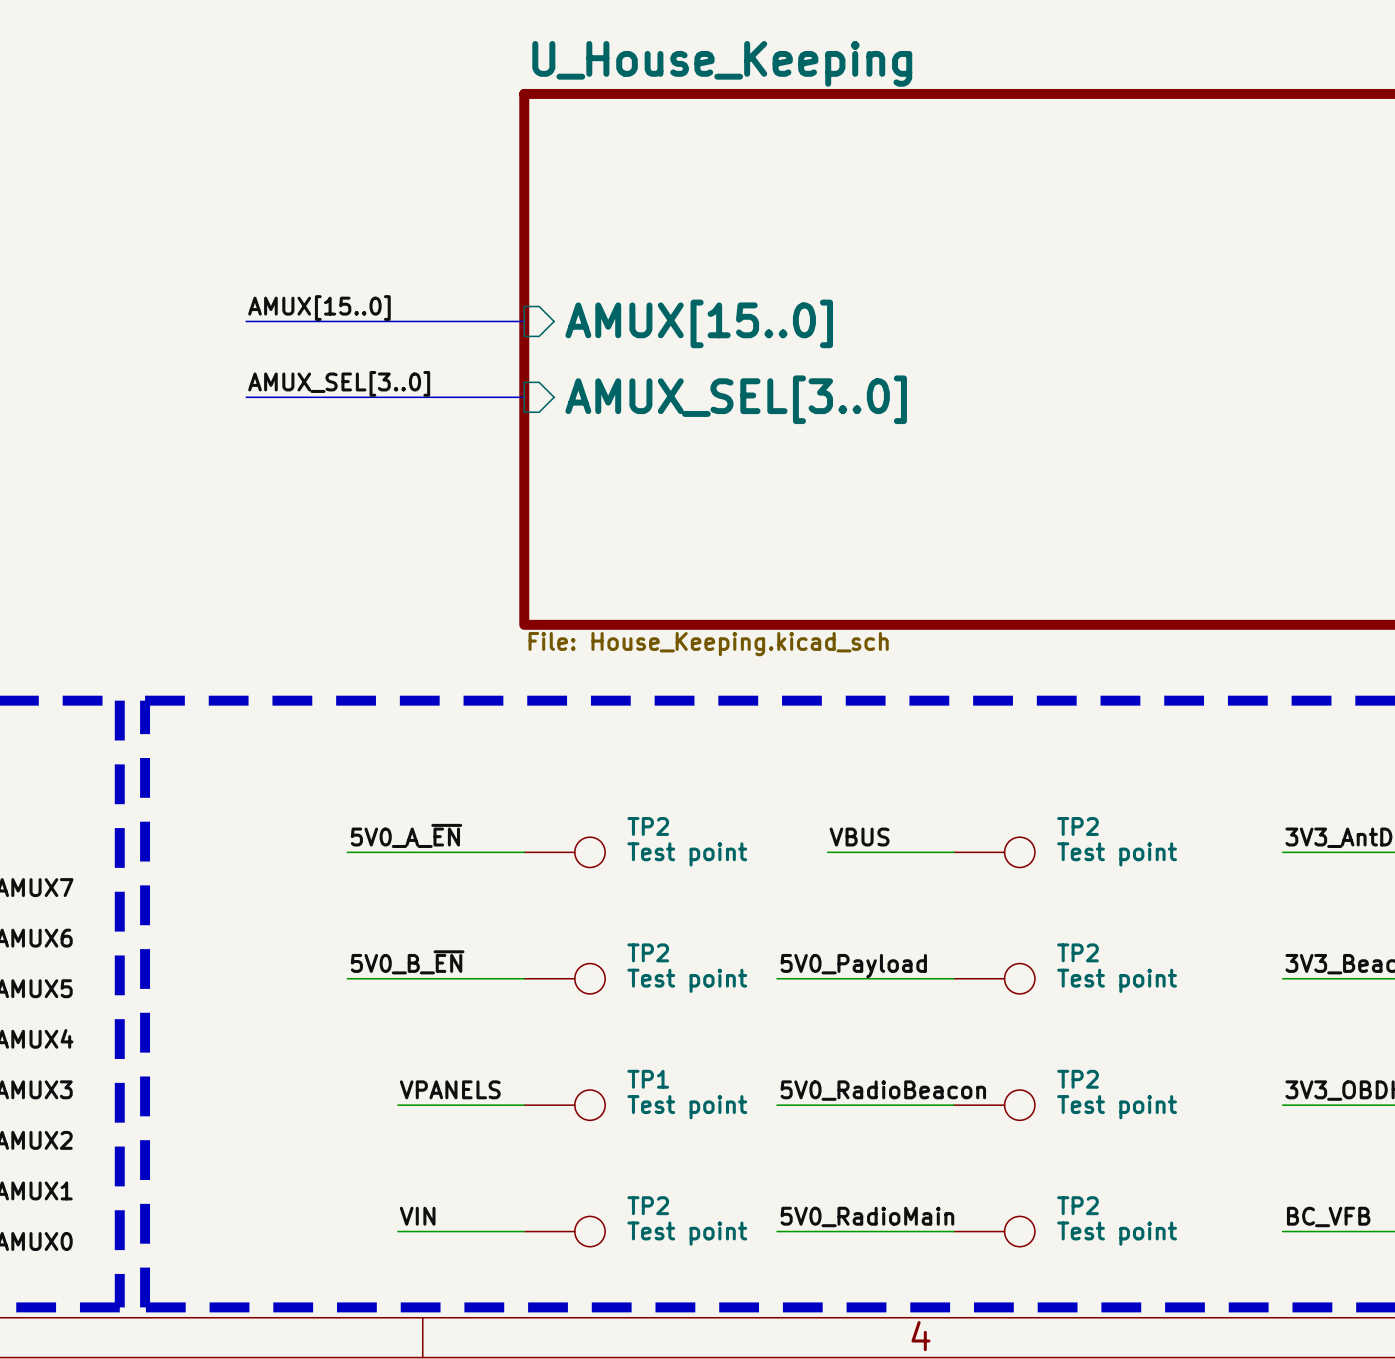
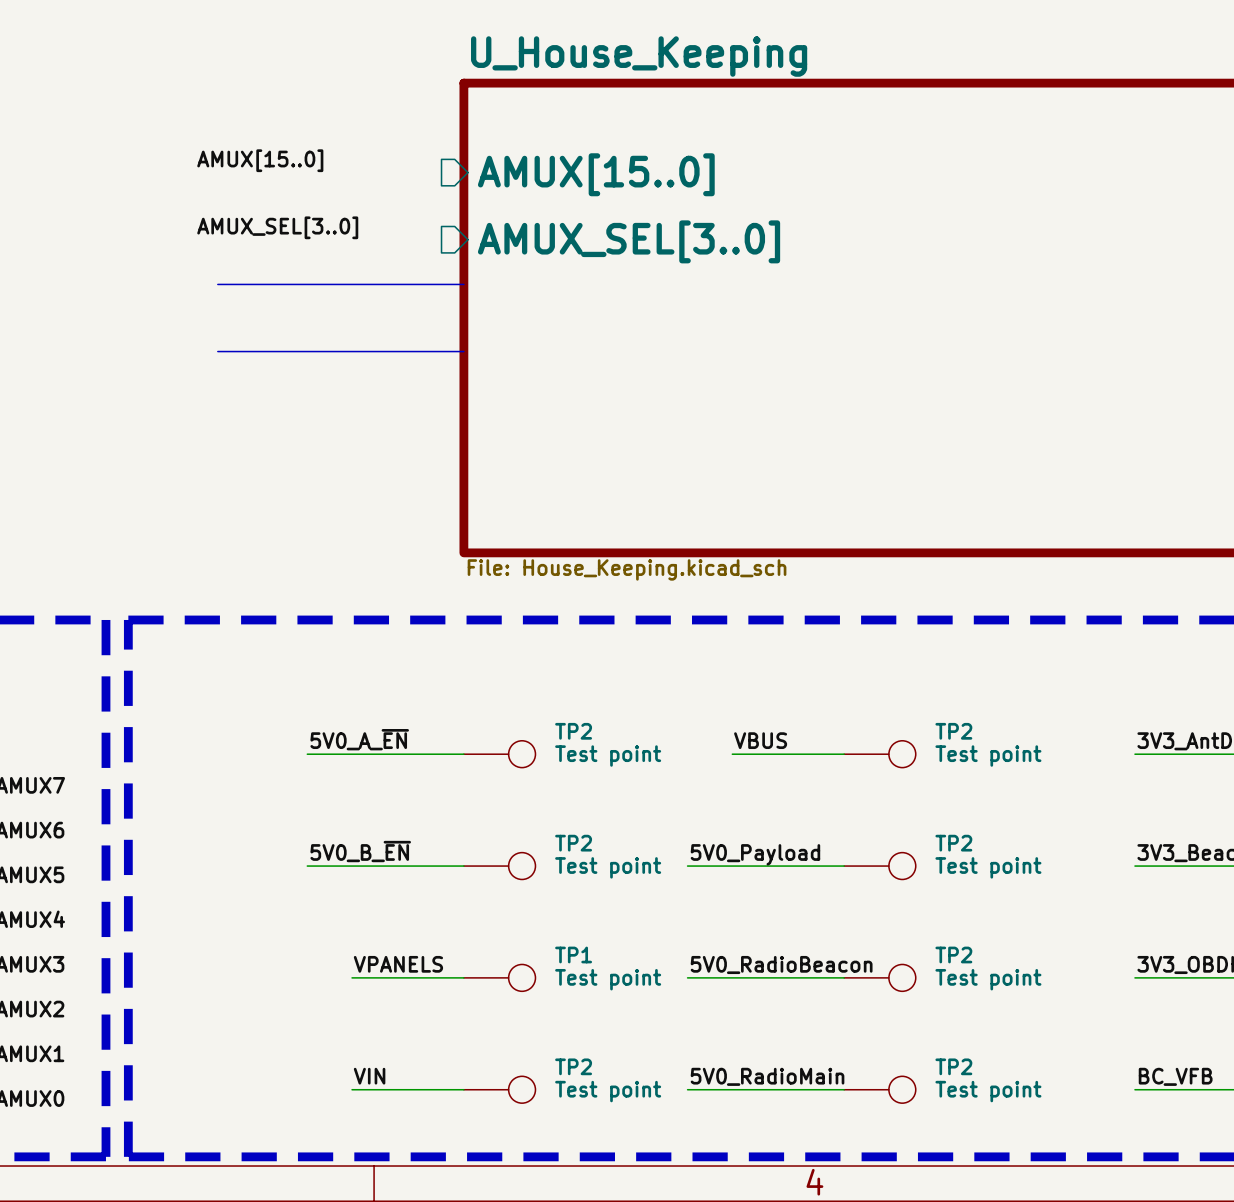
label position: AMUX[15..0] (319, 308) -> AMUX[15..0] (260, 160)
sheet pin position: AMUX[15..0] (699, 323) -> AMUX[15..0] (596, 174)
label position: AMUX_SEL[3..0] (339, 383) -> AMUX_SEL[3..0] (277, 227)
sheet pin position: AMUX_SEL[3..0] (736, 399) -> AMUX_SEL[3..0] (629, 241)

